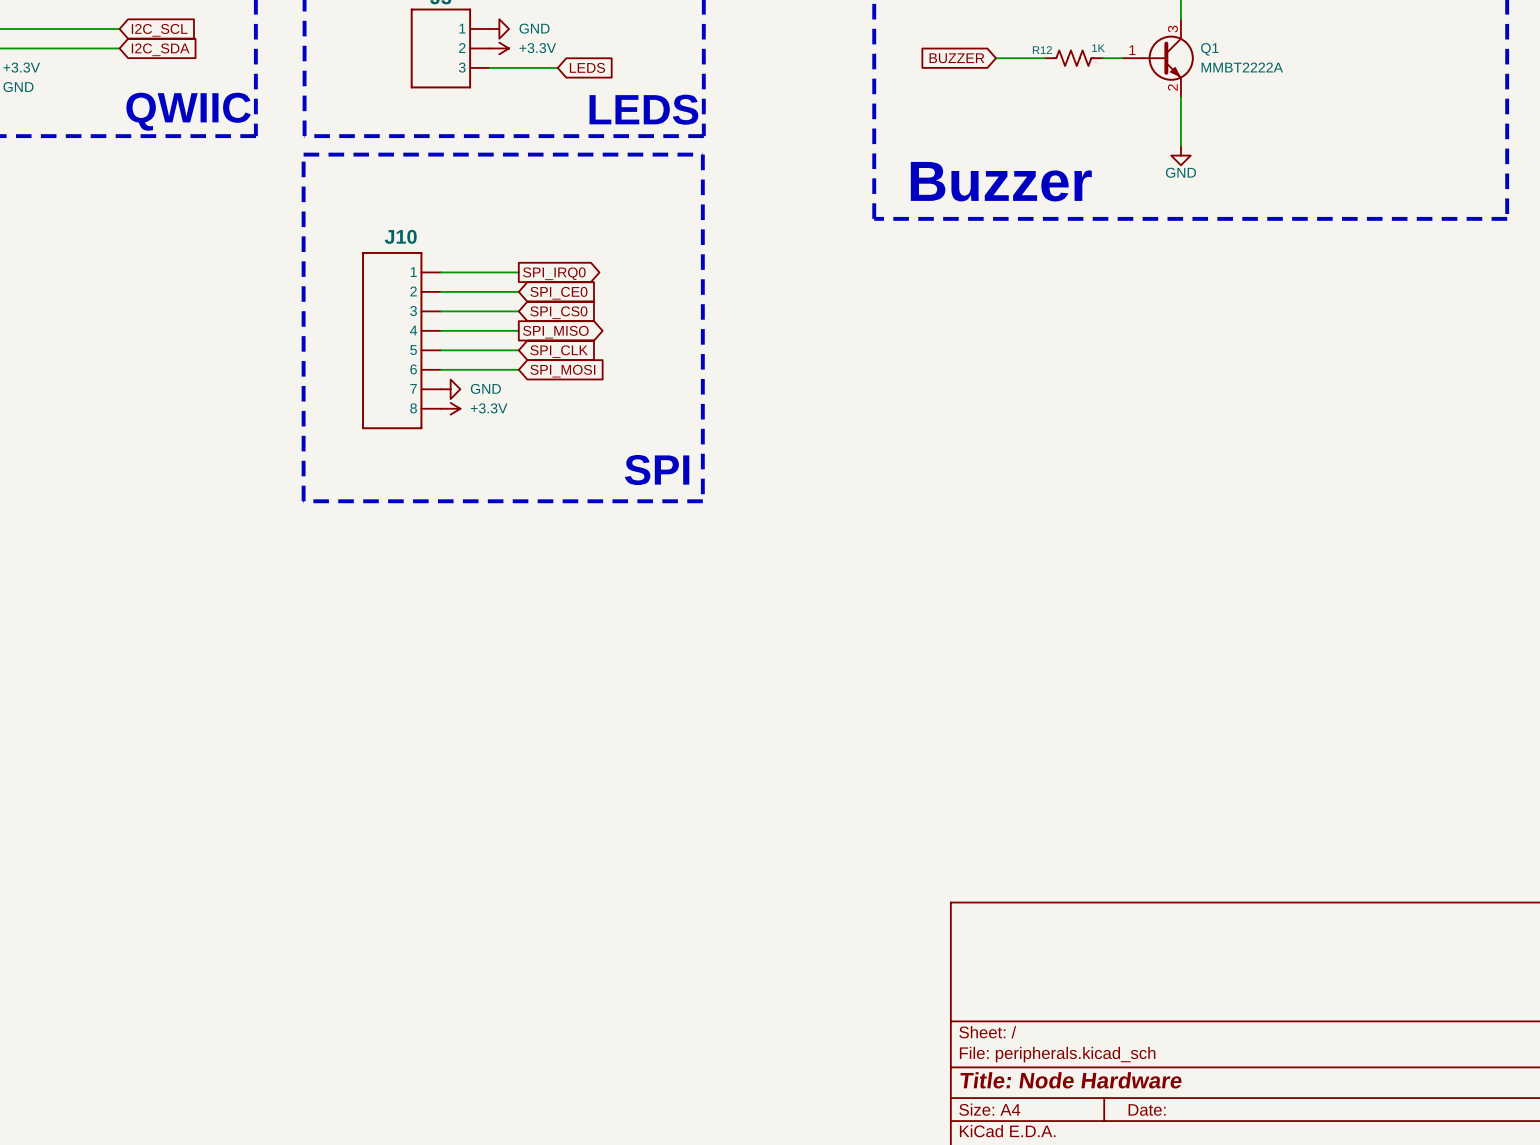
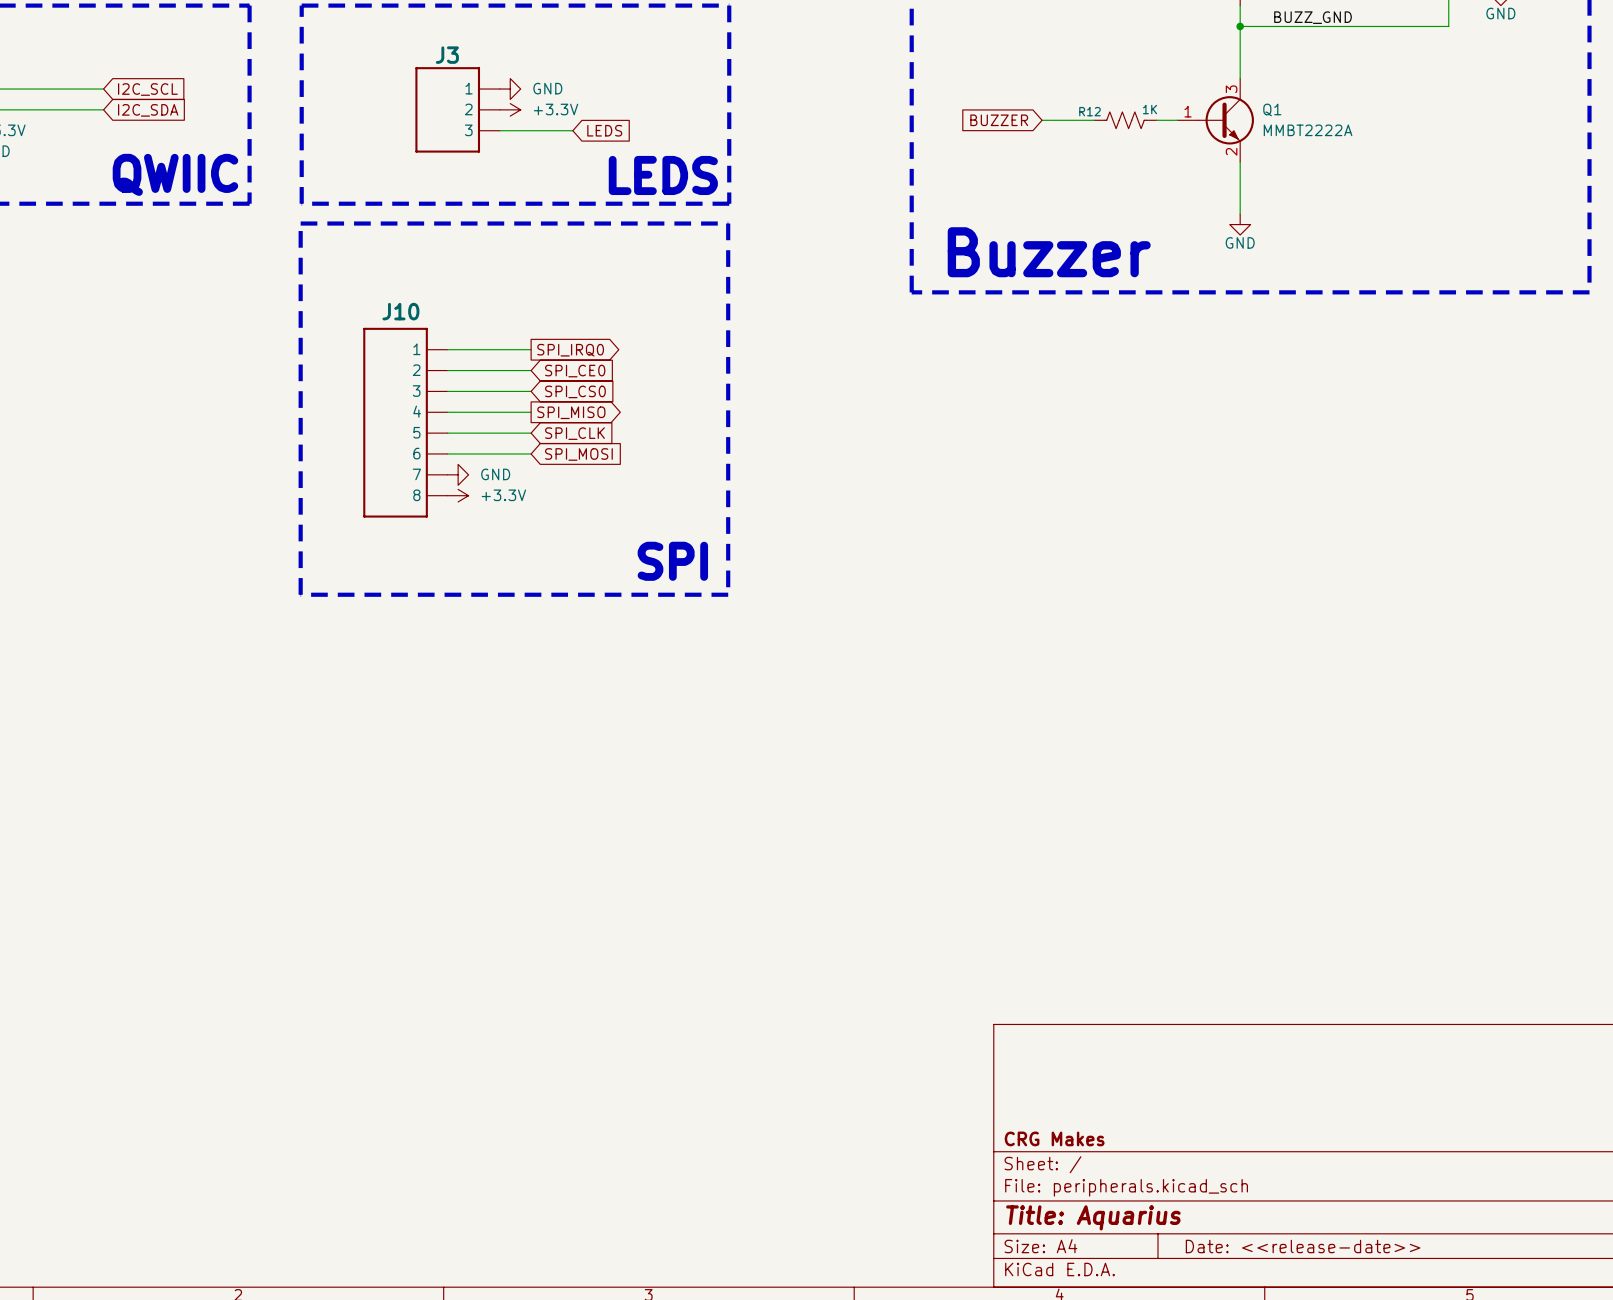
title block: none -> CRG Makes (1054, 1138)
title block: Title: Node Hardware (1071, 1080) -> Title: Aquarius (1093, 1217)
title block: Date: (1147, 1109) -> Date: <<release-date>> (1303, 1246)

